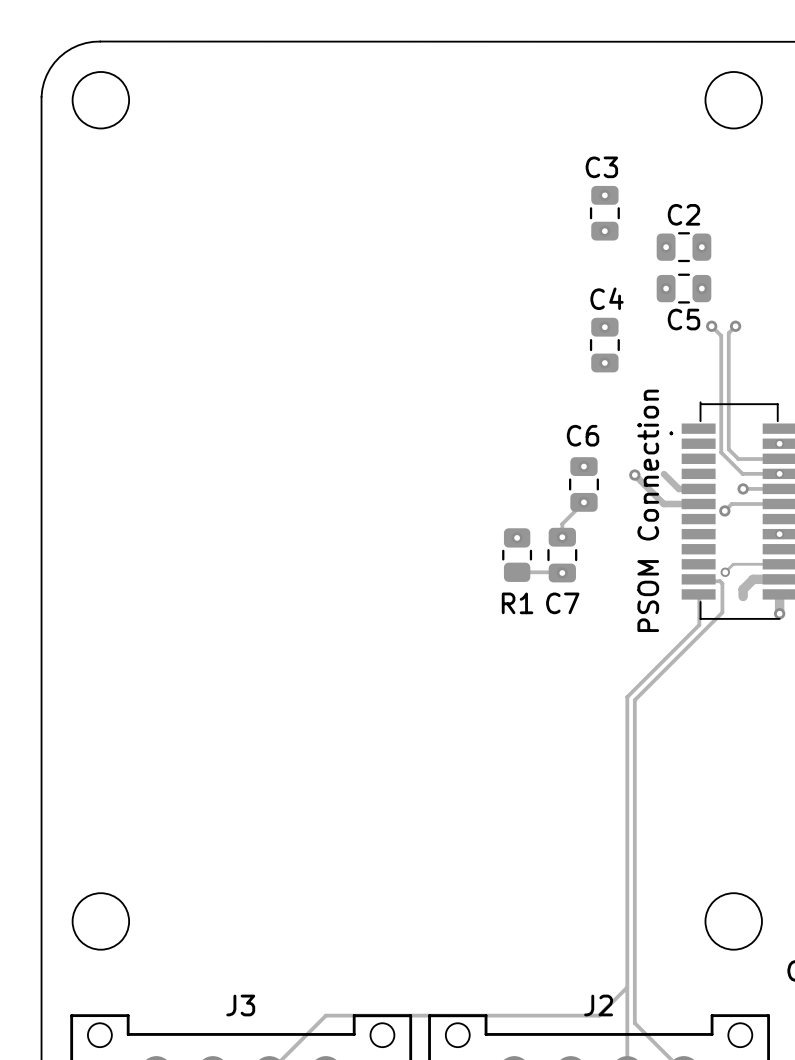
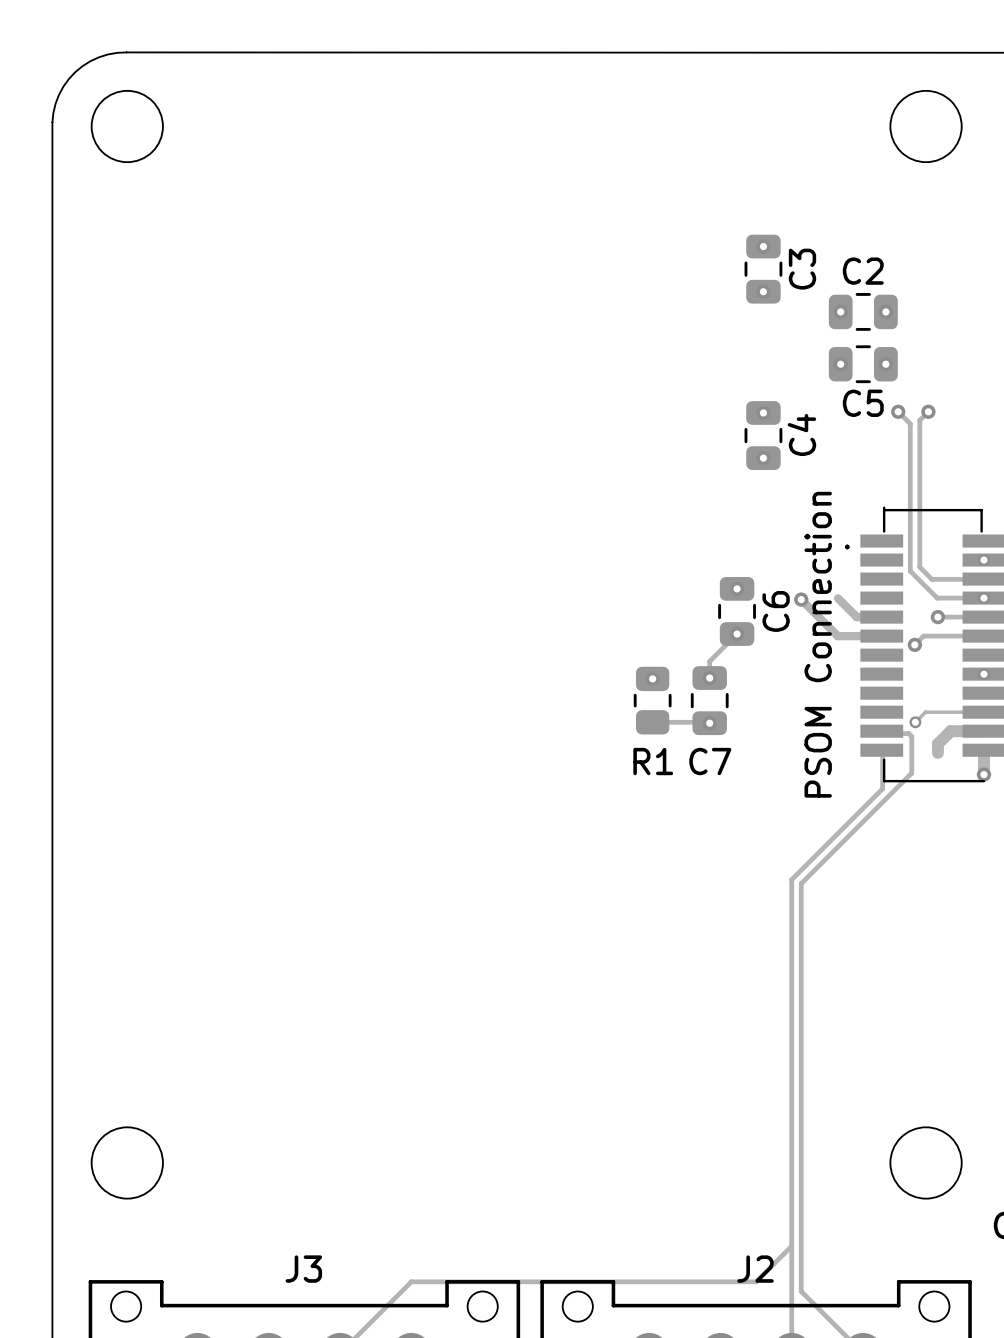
C3 name rotation: 0° (601, 167) -> 90° counterclockwise (802, 269)
C3 name position: C3 (601, 167) -> C3 (802, 269)
C4 name rotation: 0° (607, 298) -> 90° counterclockwise (801, 434)
C4 name position: C4 (607, 298) -> C4 (801, 434)
C6 name rotation: 0° (583, 435) -> 90° counterclockwise (776, 611)
C6 name position: C6 (583, 435) -> C6 (776, 611)

